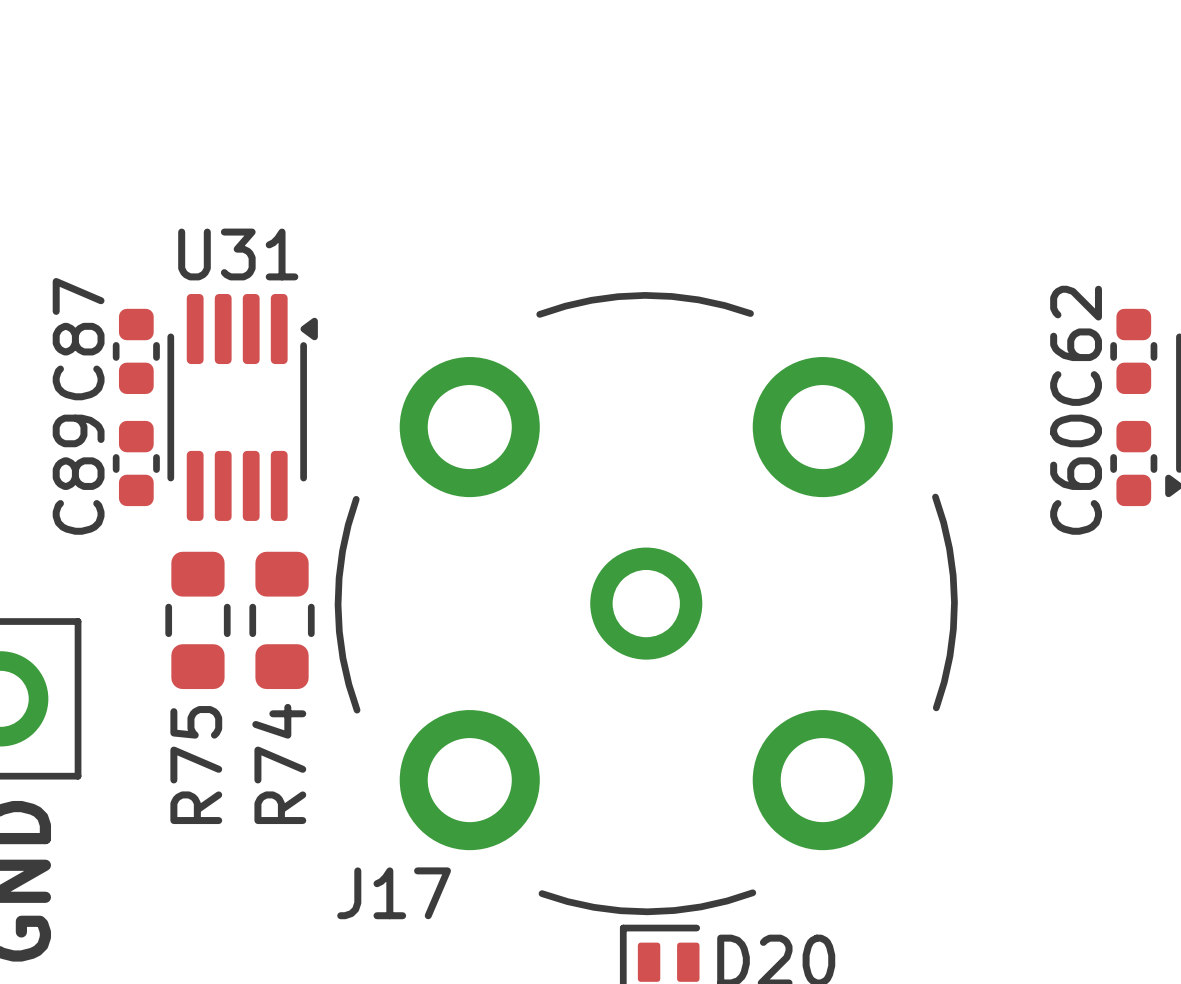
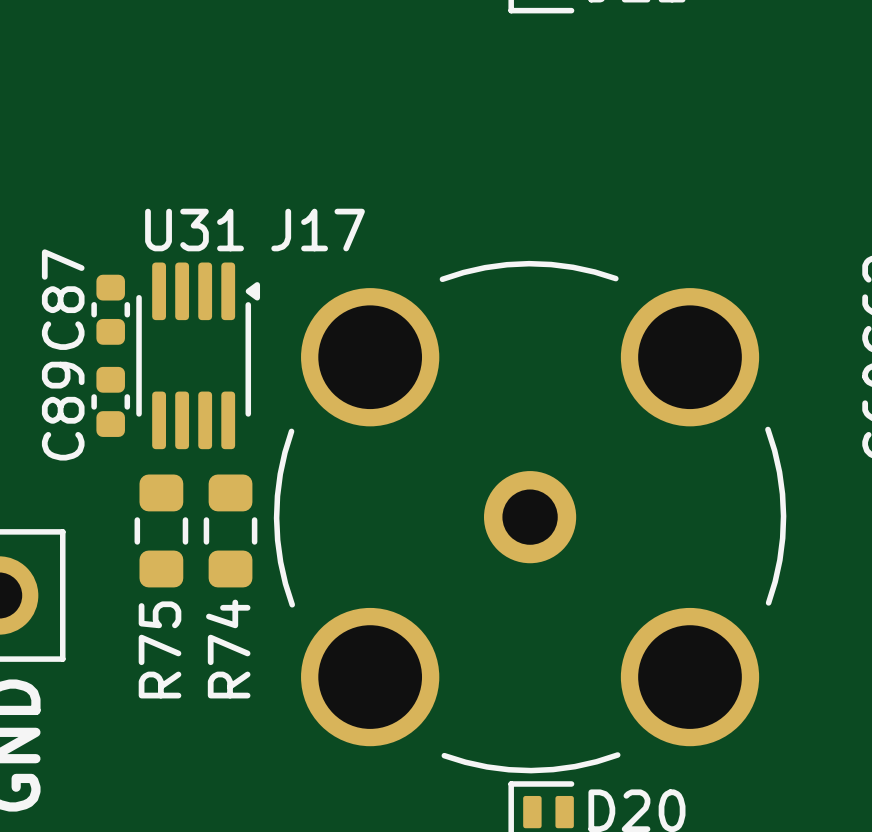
J17 footprint: [334, 292, 958, 916] -> [273, 260, 787, 774]
J17 name position: J17 (394, 893) -> J17 (318, 230)

